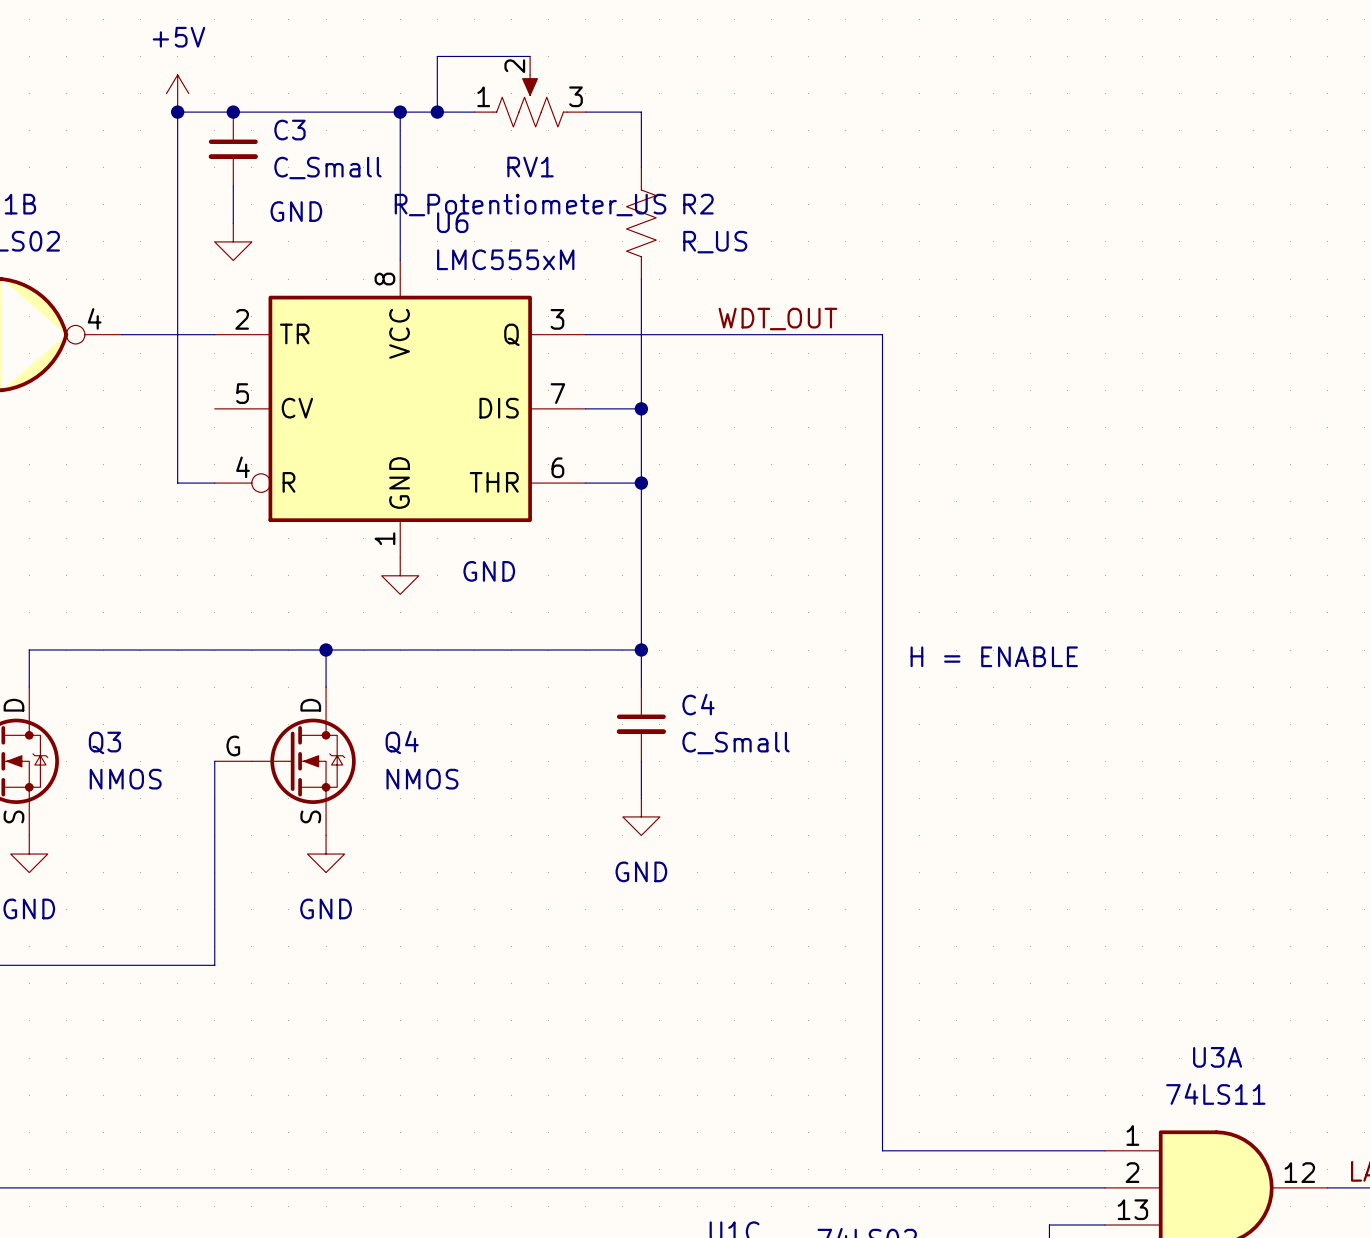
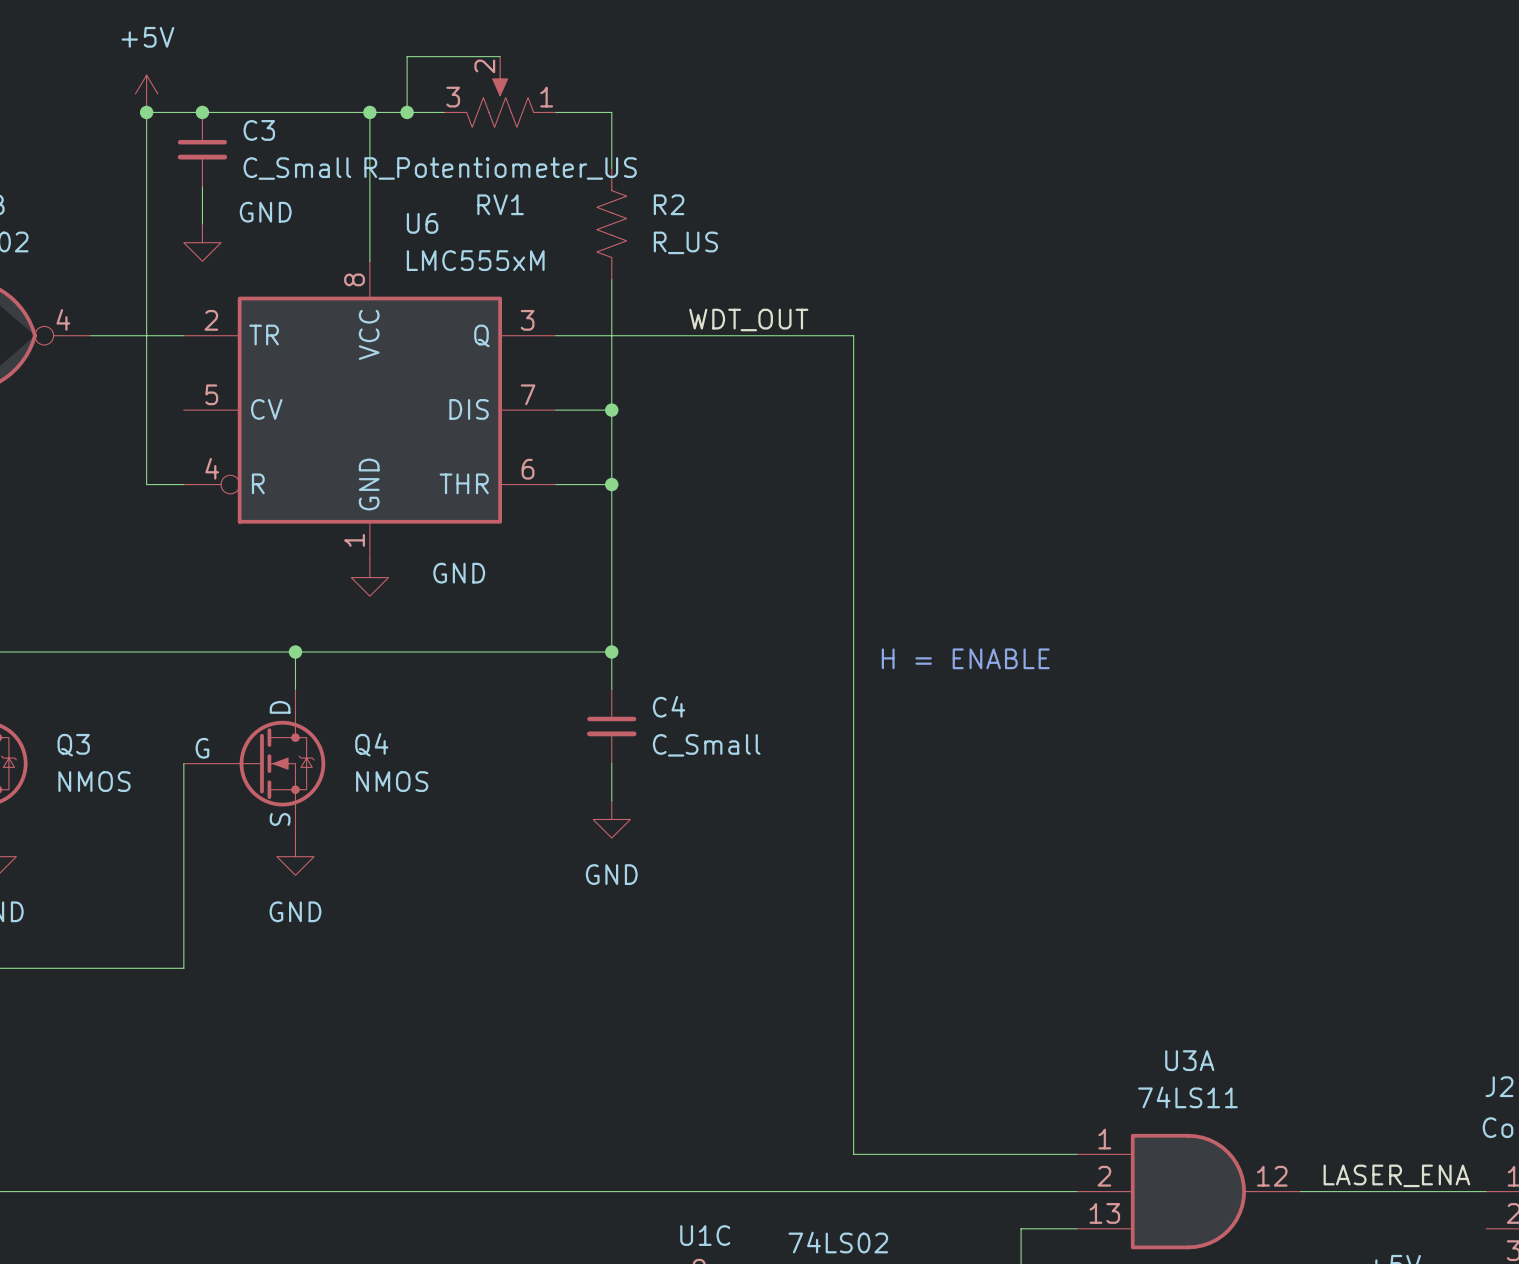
RV1 flip: as is (530, 100) -> left-right (500, 101)
RV1 name position: RV1 (530, 167) -> RV1 (500, 204)
RV1 value position: R_Potentiometer_US (530, 205) -> R_Potentiometer_US (500, 168)

